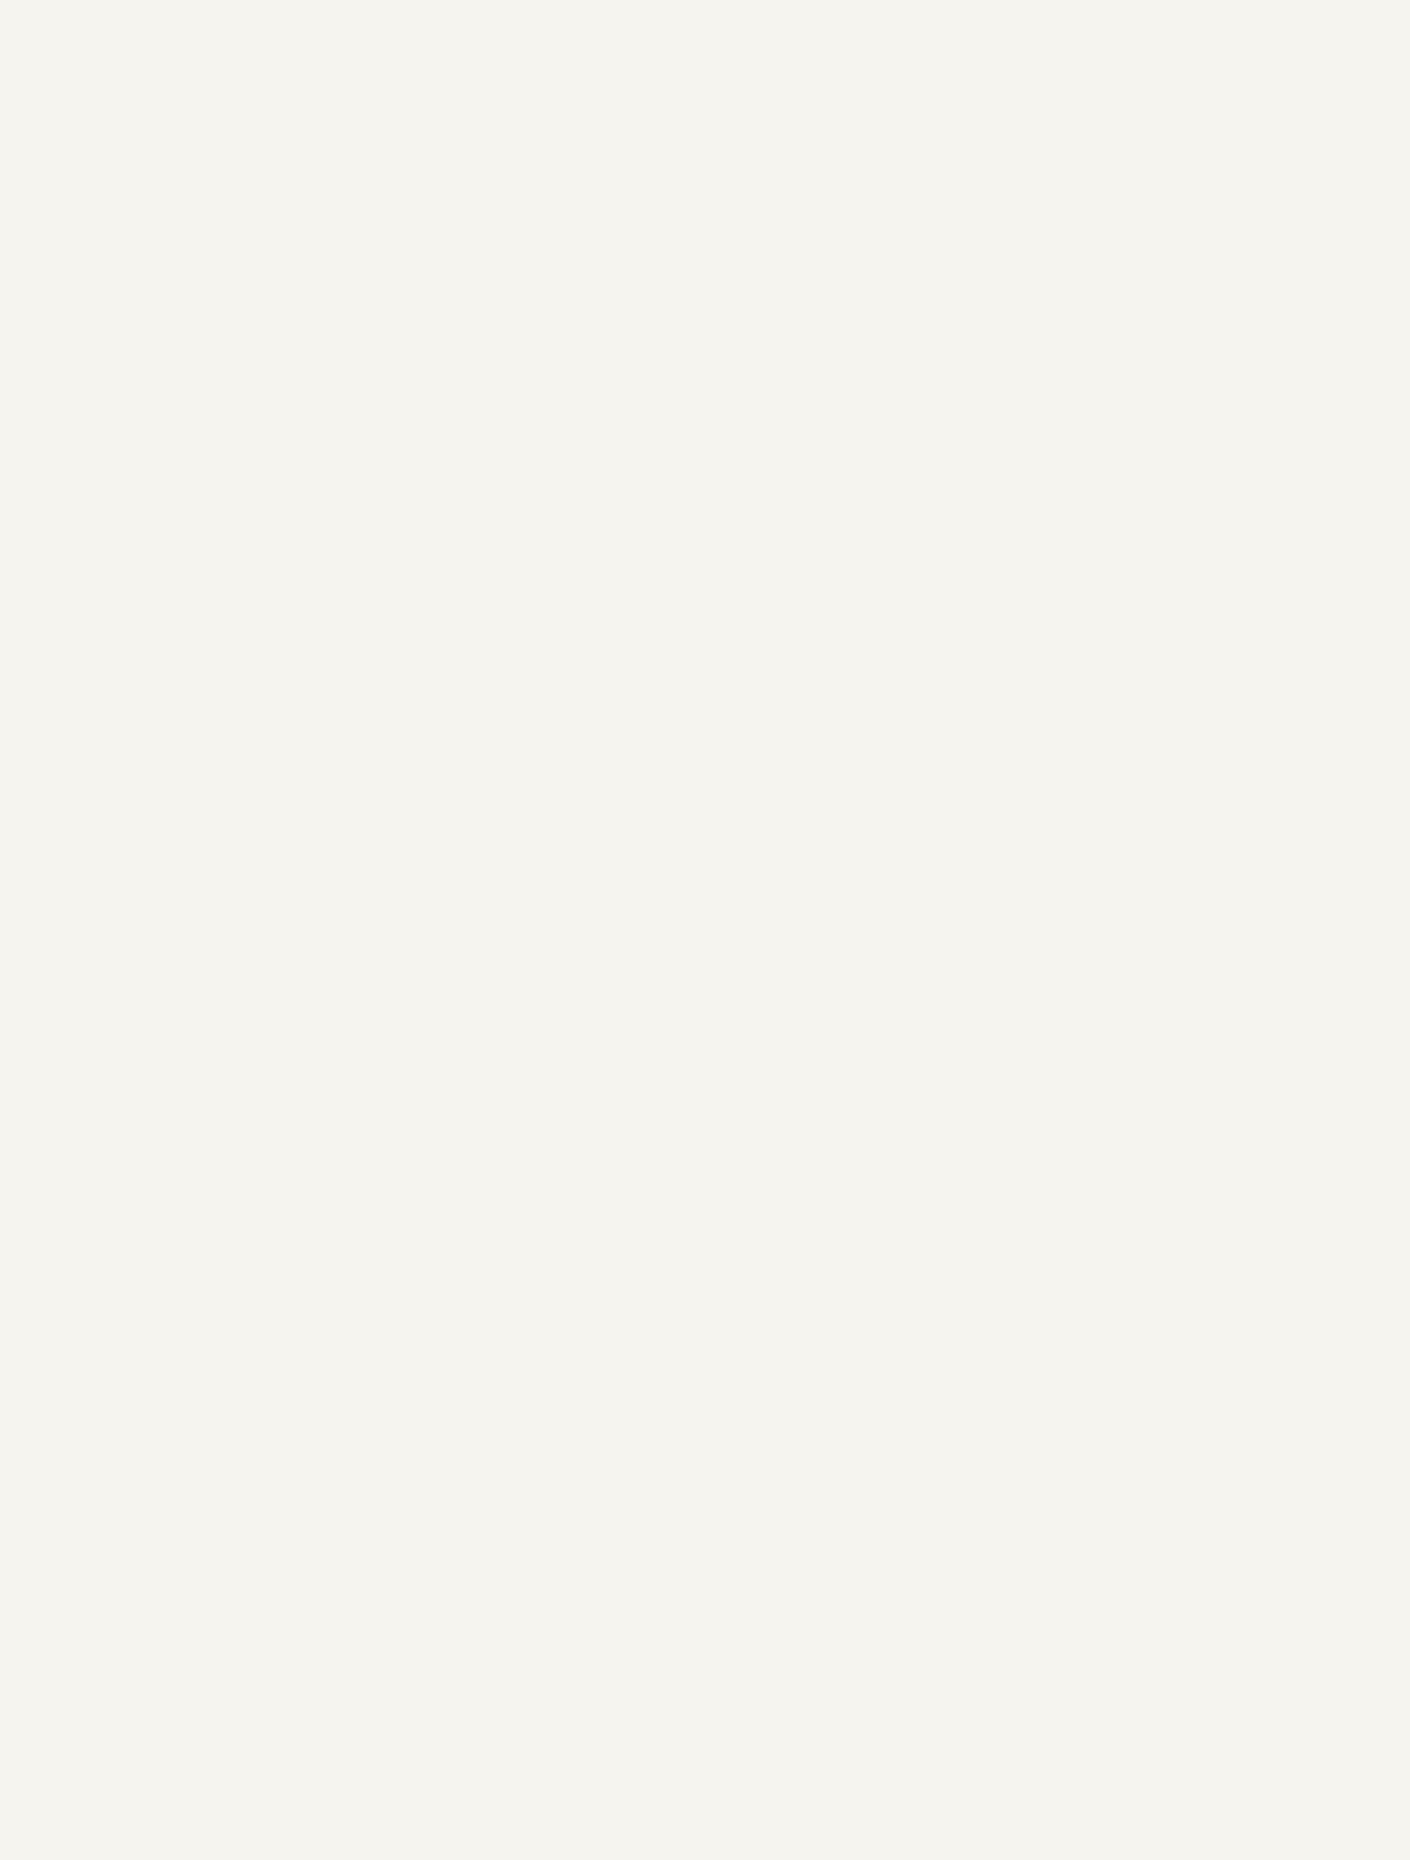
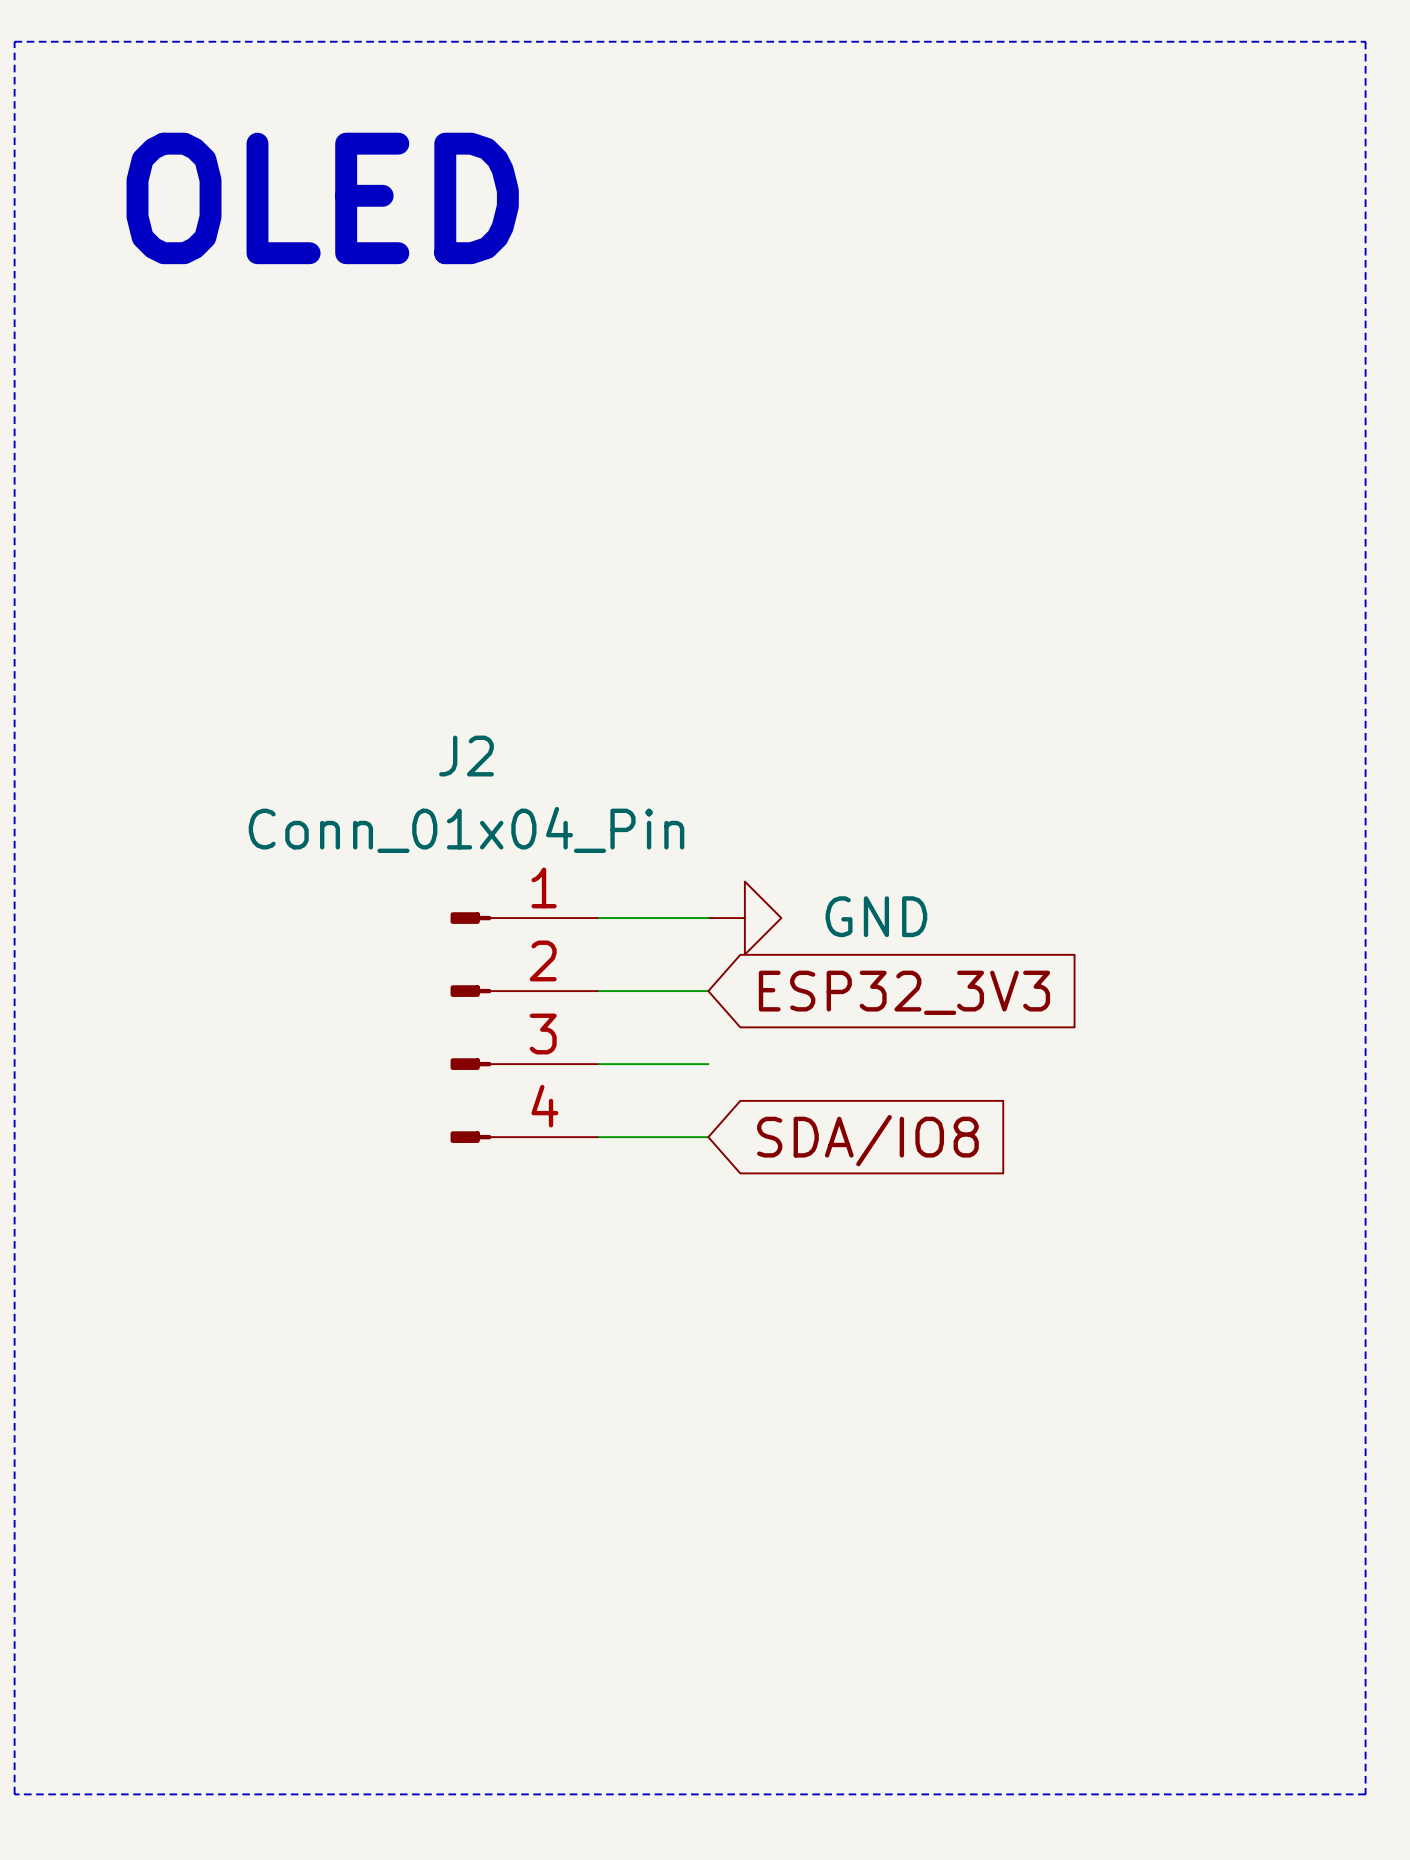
line: none -> (14, 41) (1365, 41) (1365, 1794) (14, 1794) (14, 41)
text: none -> OLED (322, 198)
wire: none -> (598, 918) (708, 918)
power symbol: none -> GND (744, 918)
wire: none -> (598, 991) (708, 991)
global label: none -> ESP32_3V3 (904, 992)
J2: none -> Conn_01x04_Pin (524, 1027)
wire: none -> (598, 1064) (708, 1064)
wire: none -> (598, 1137) (708, 1137)
global label: none -> SDA/IO8 (867, 1140)

